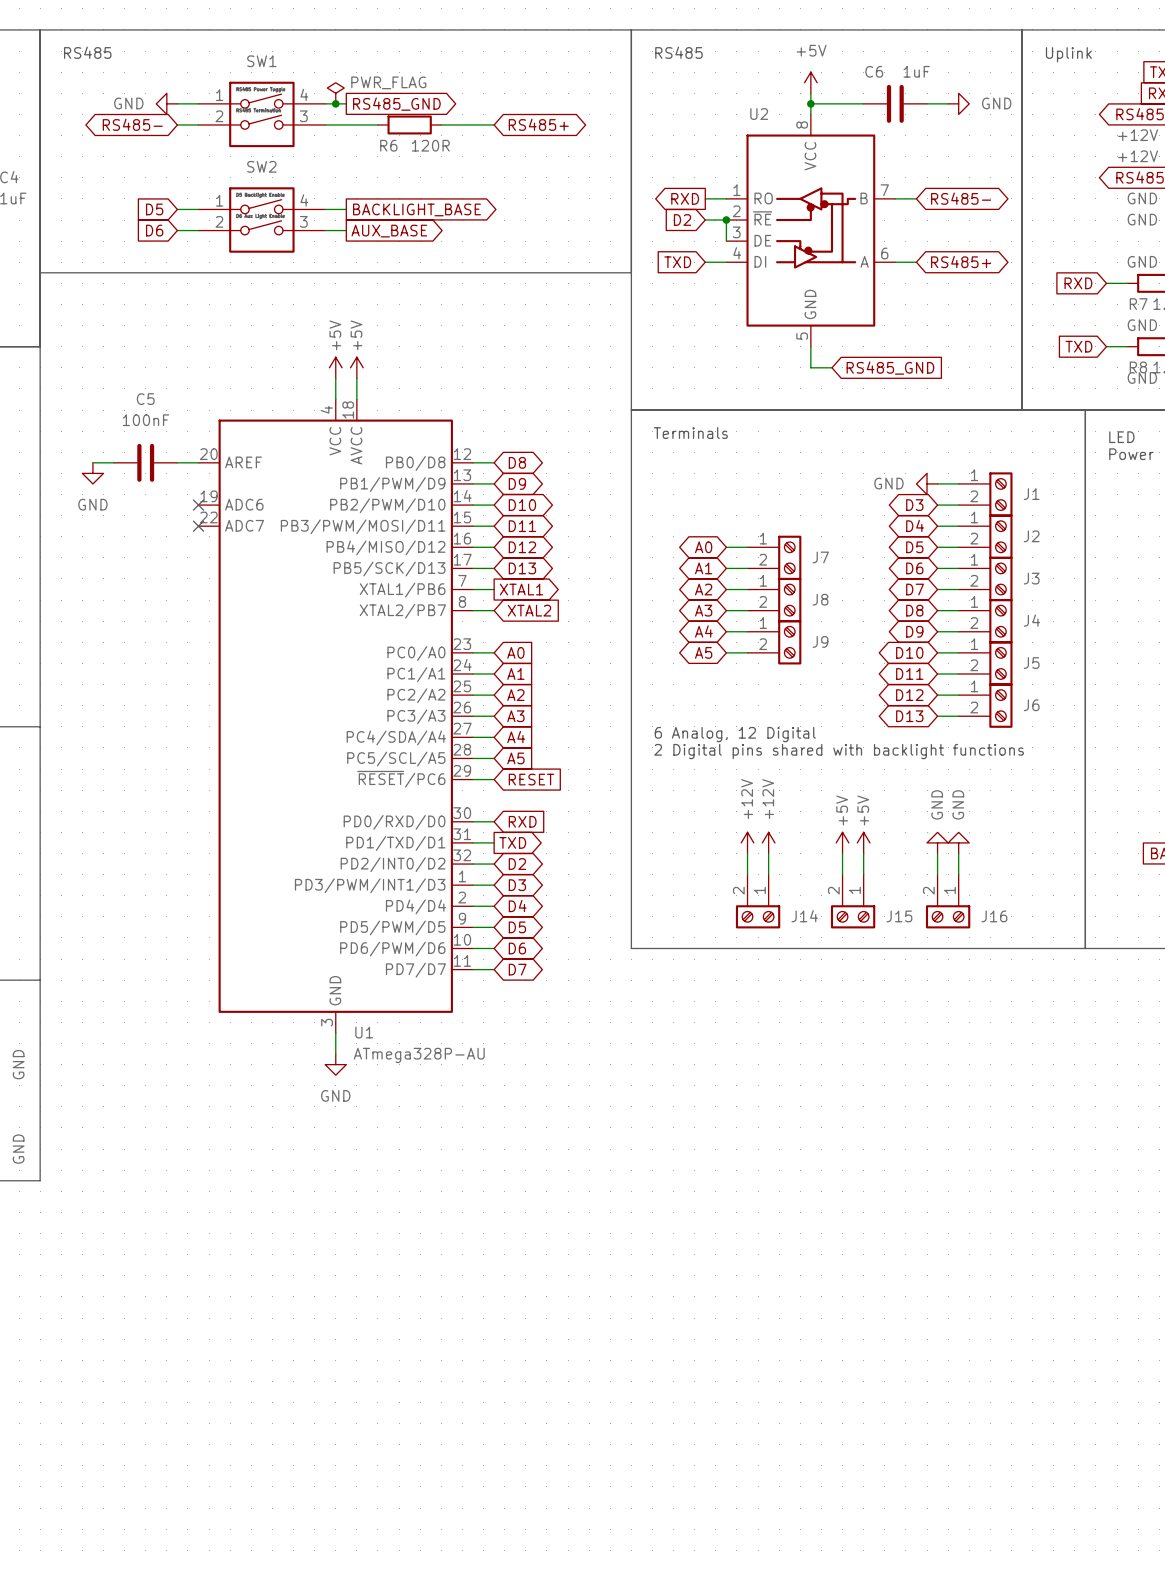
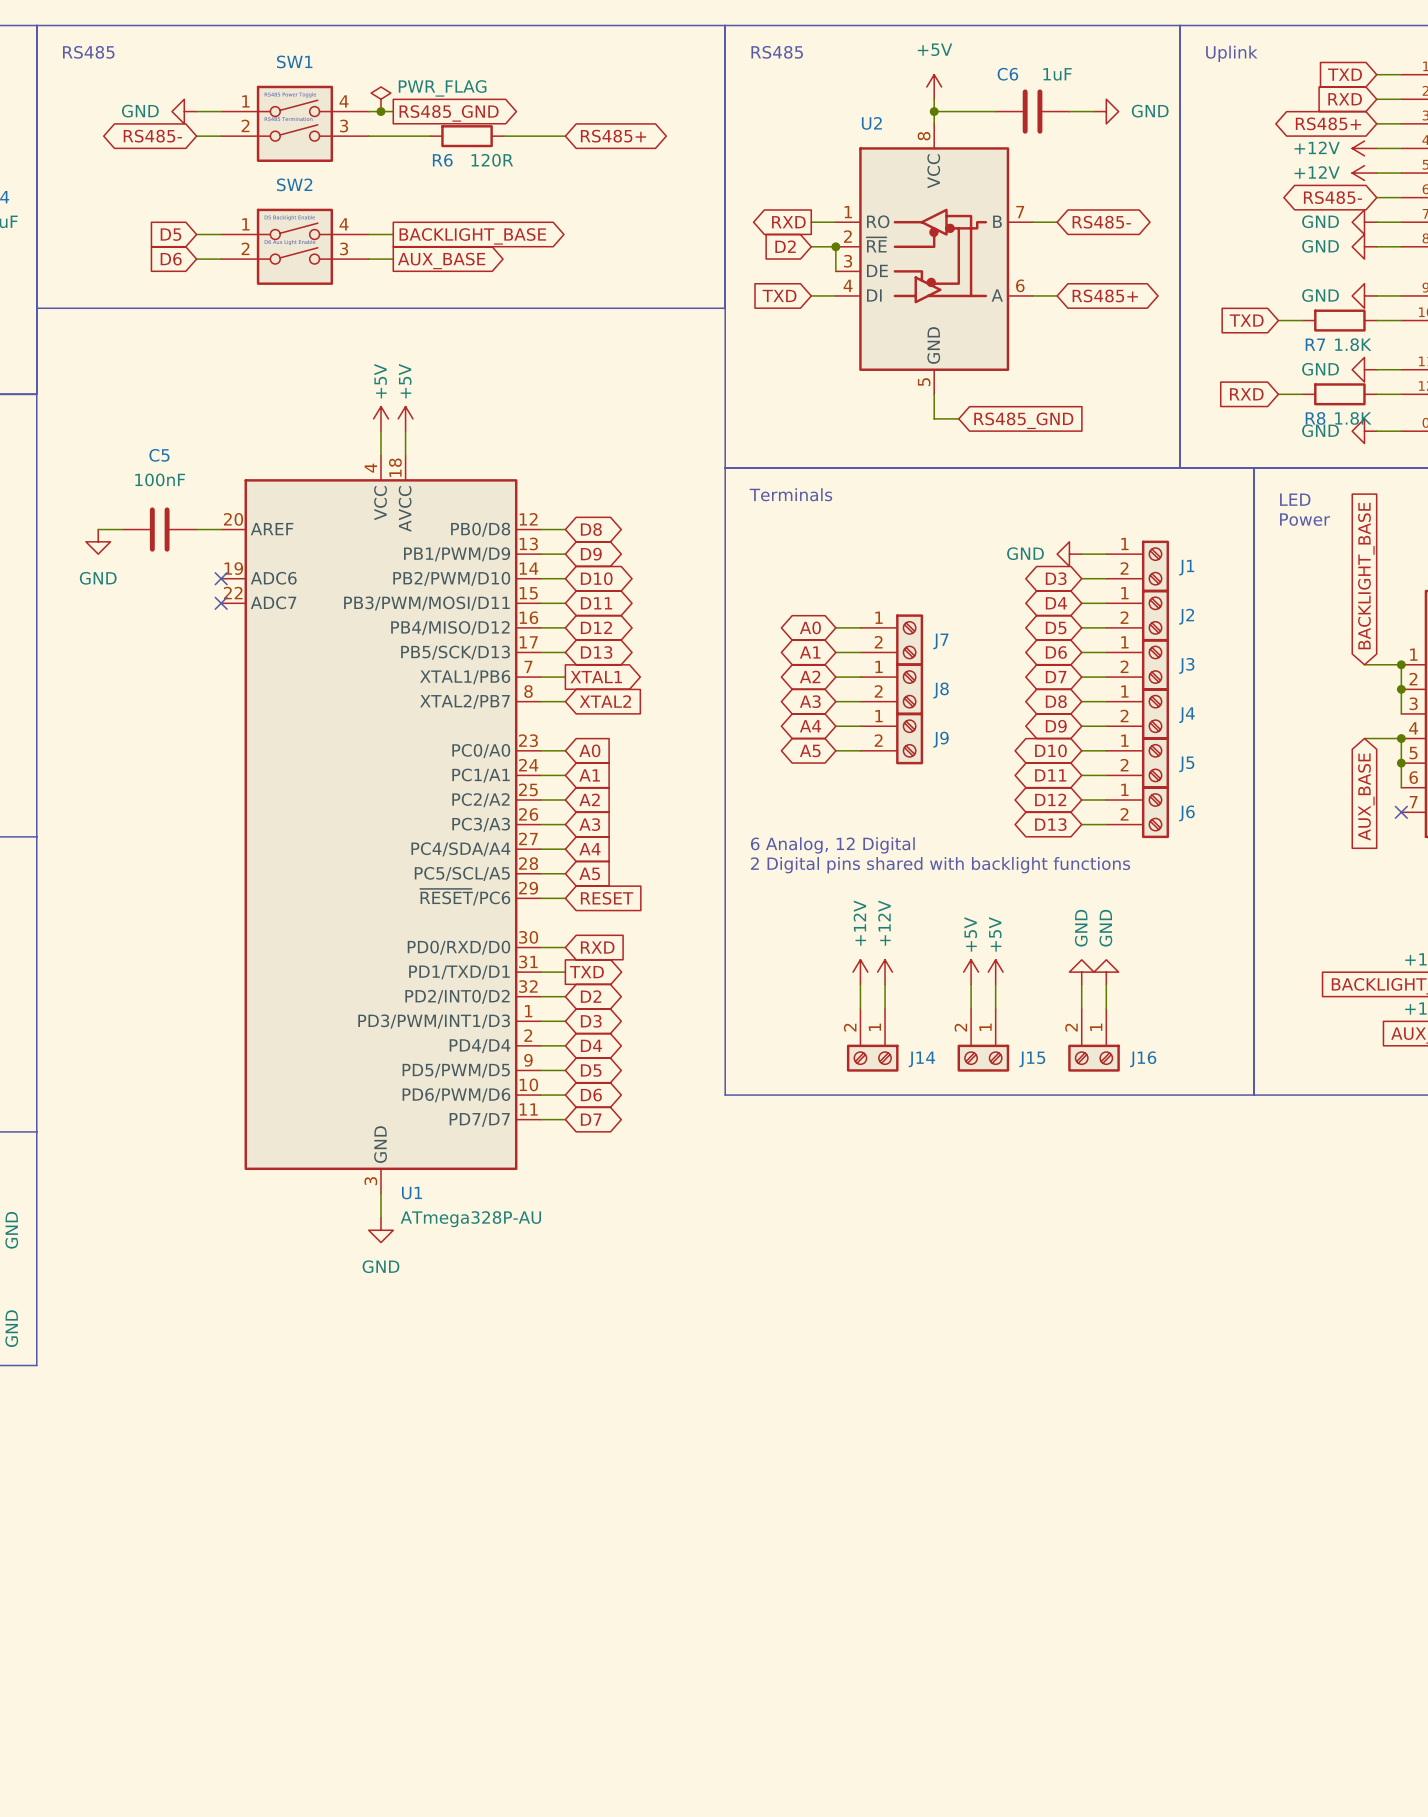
global label: RXD (1078, 283) -> TXD (1246, 320)
global label: TXD (1078, 346) -> RXD (1246, 394)

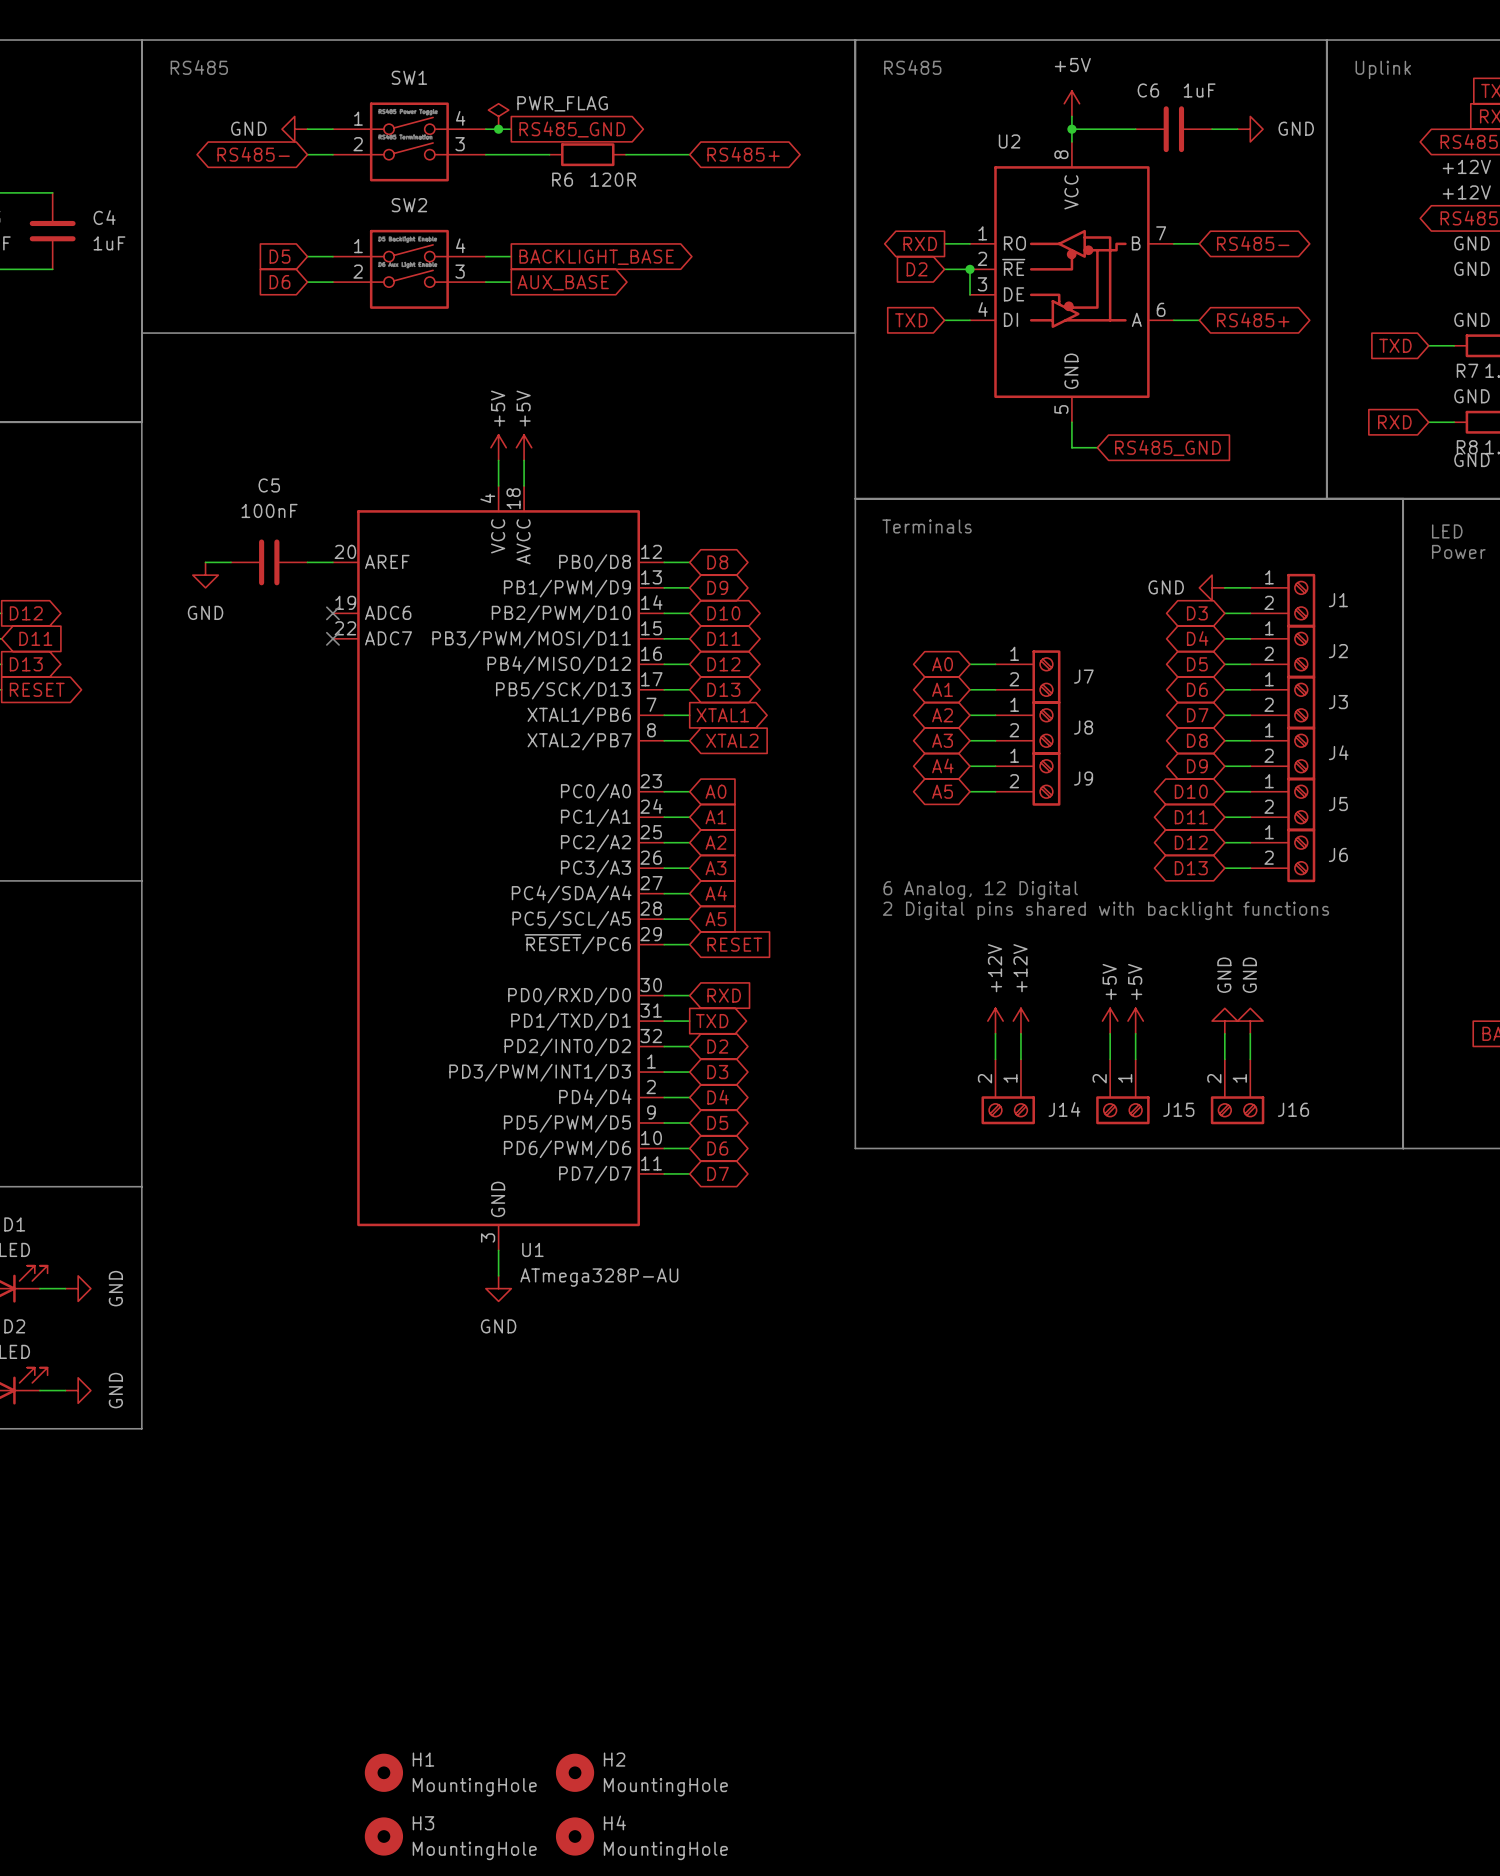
H1: none -> MountingHole (383, 1772)
H2: none -> MountingHole (575, 1772)
H3: none -> MountingHole (383, 1836)
H4: none -> MountingHole (575, 1836)

